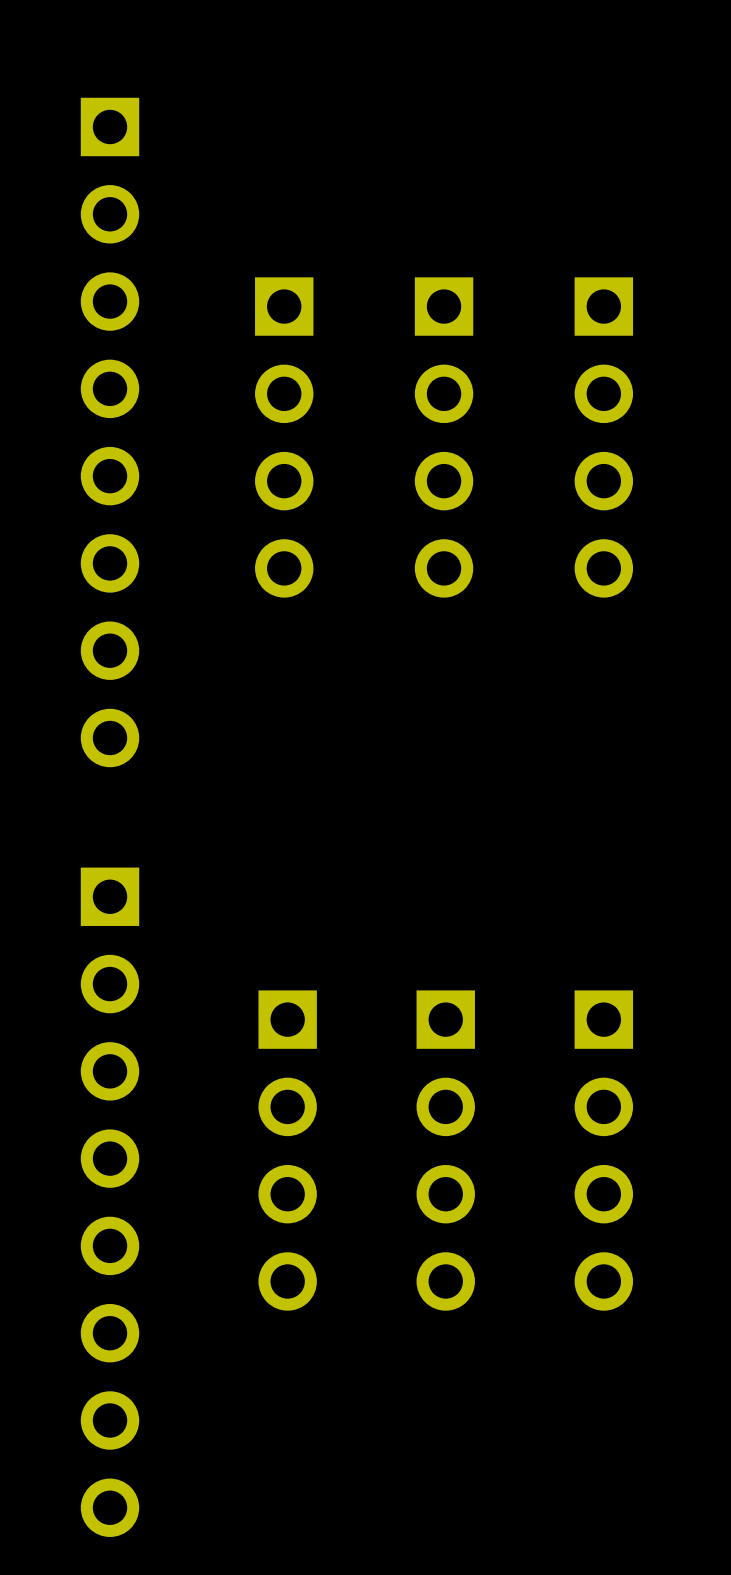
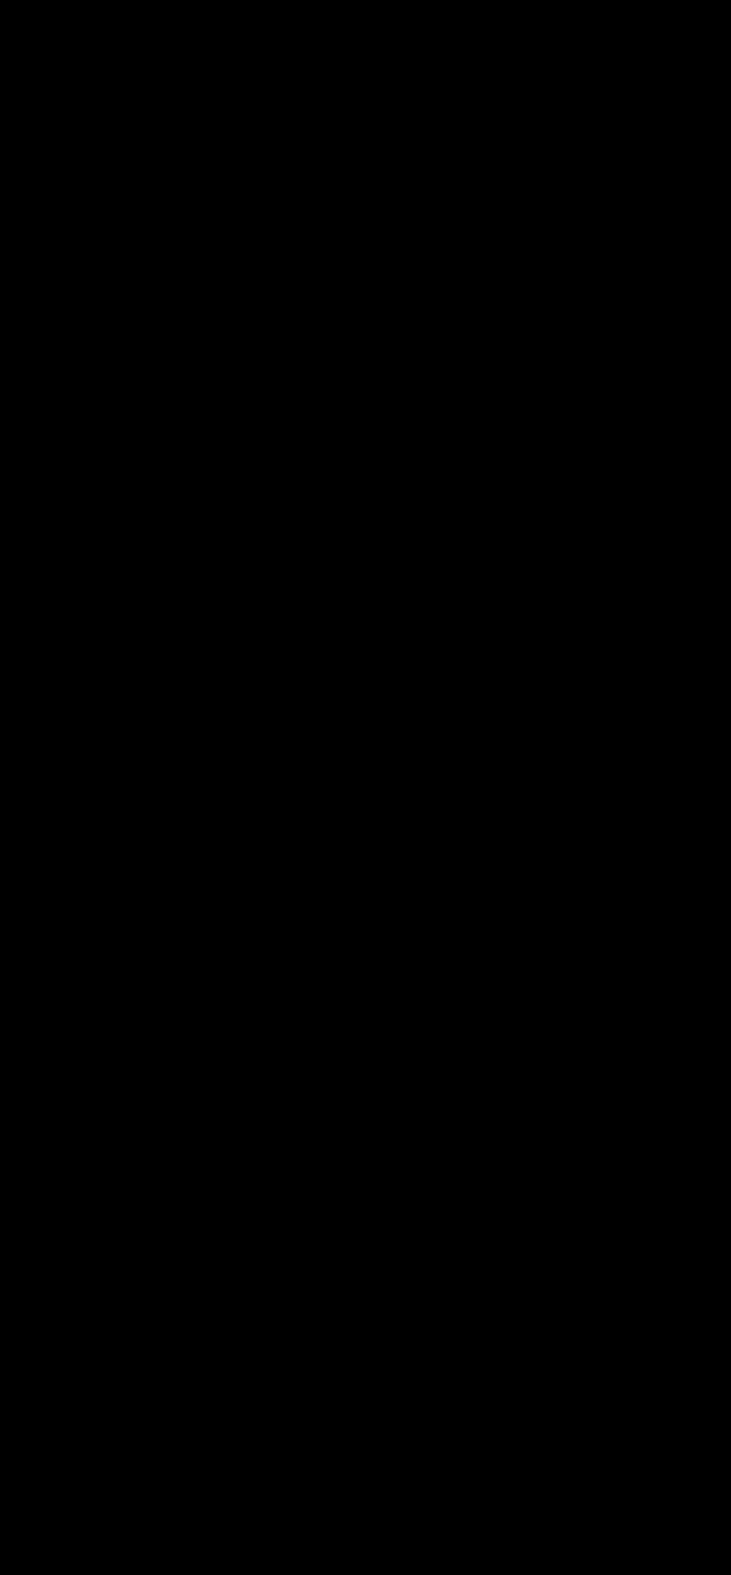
part: (110, 432) -> none
part: (284, 437) -> none
part: (444, 437) -> none
part: (603, 437) -> none
part: (287, 1150) -> none
part: (445, 1150) -> none
part: (603, 1150) -> none
part: (110, 1202) -> none

